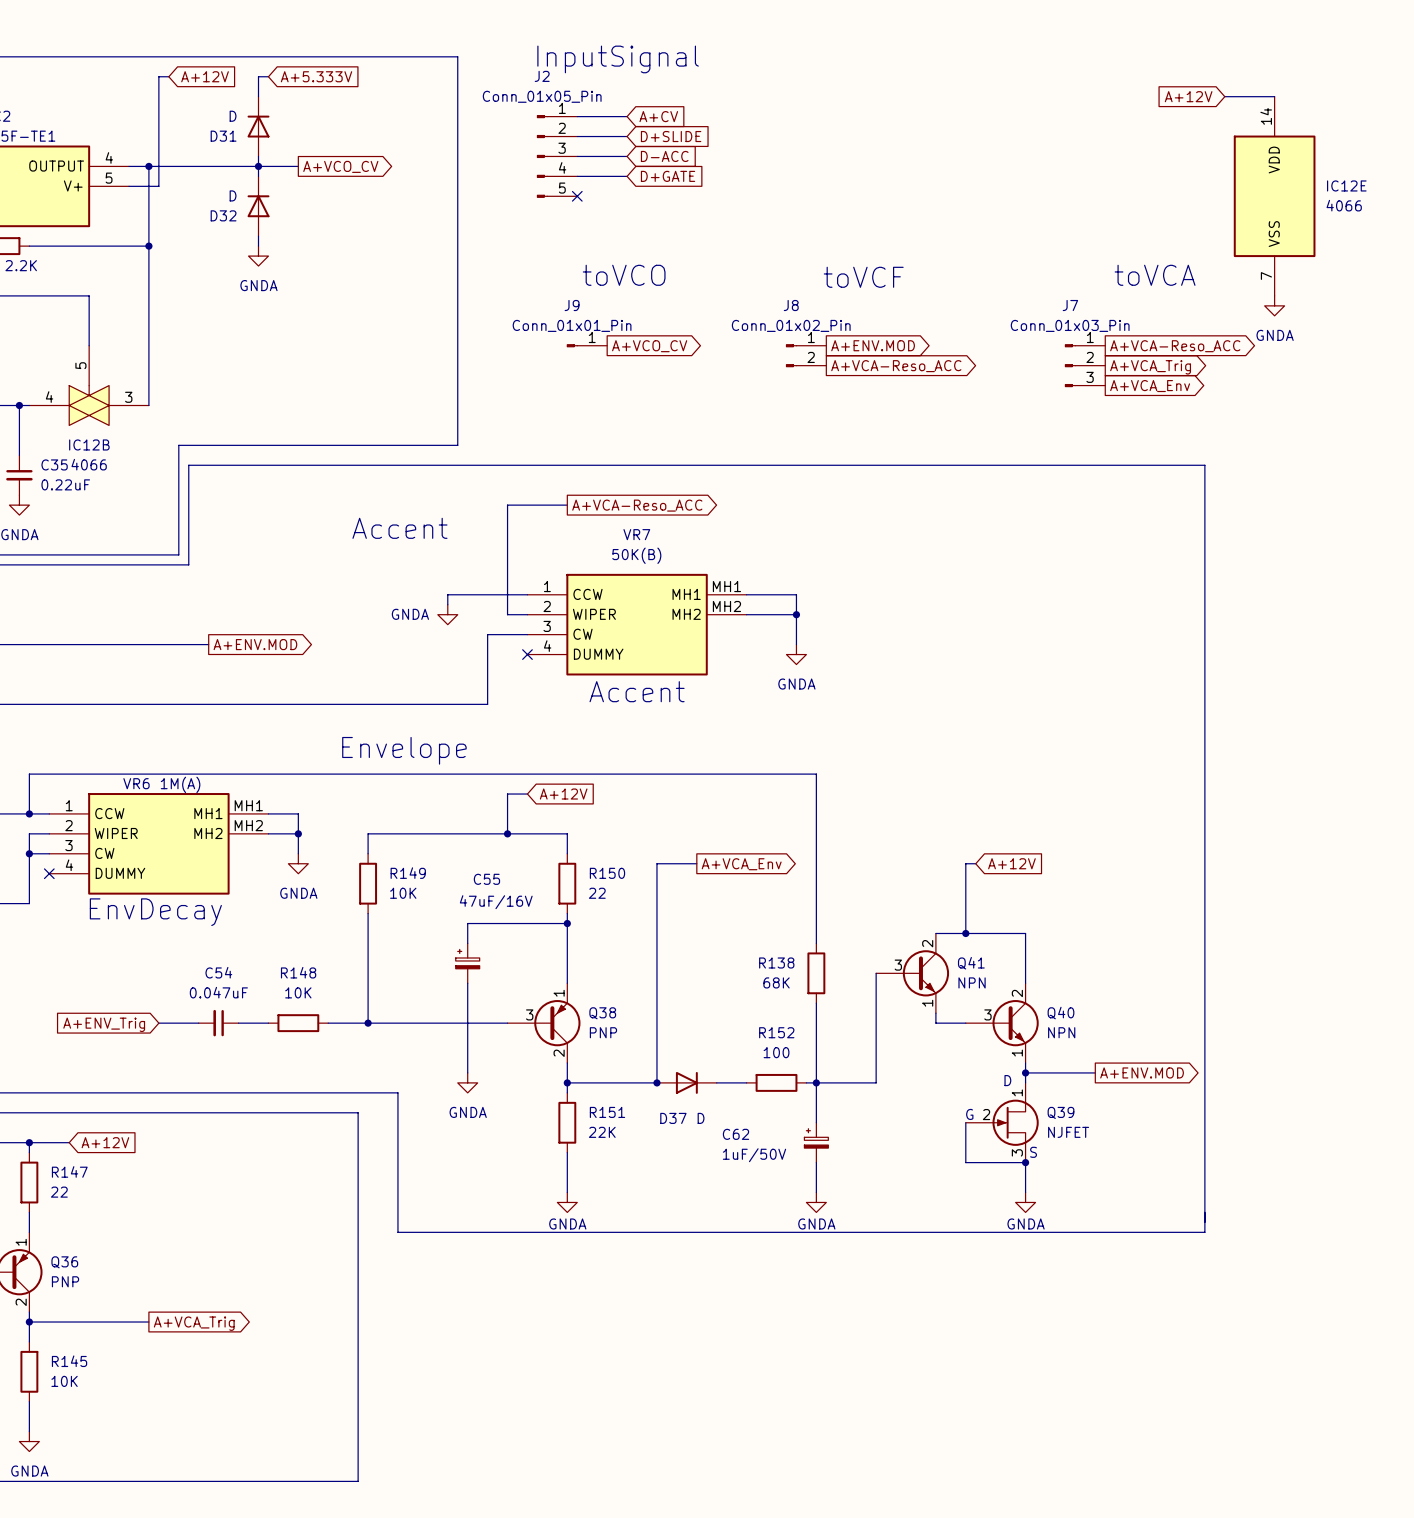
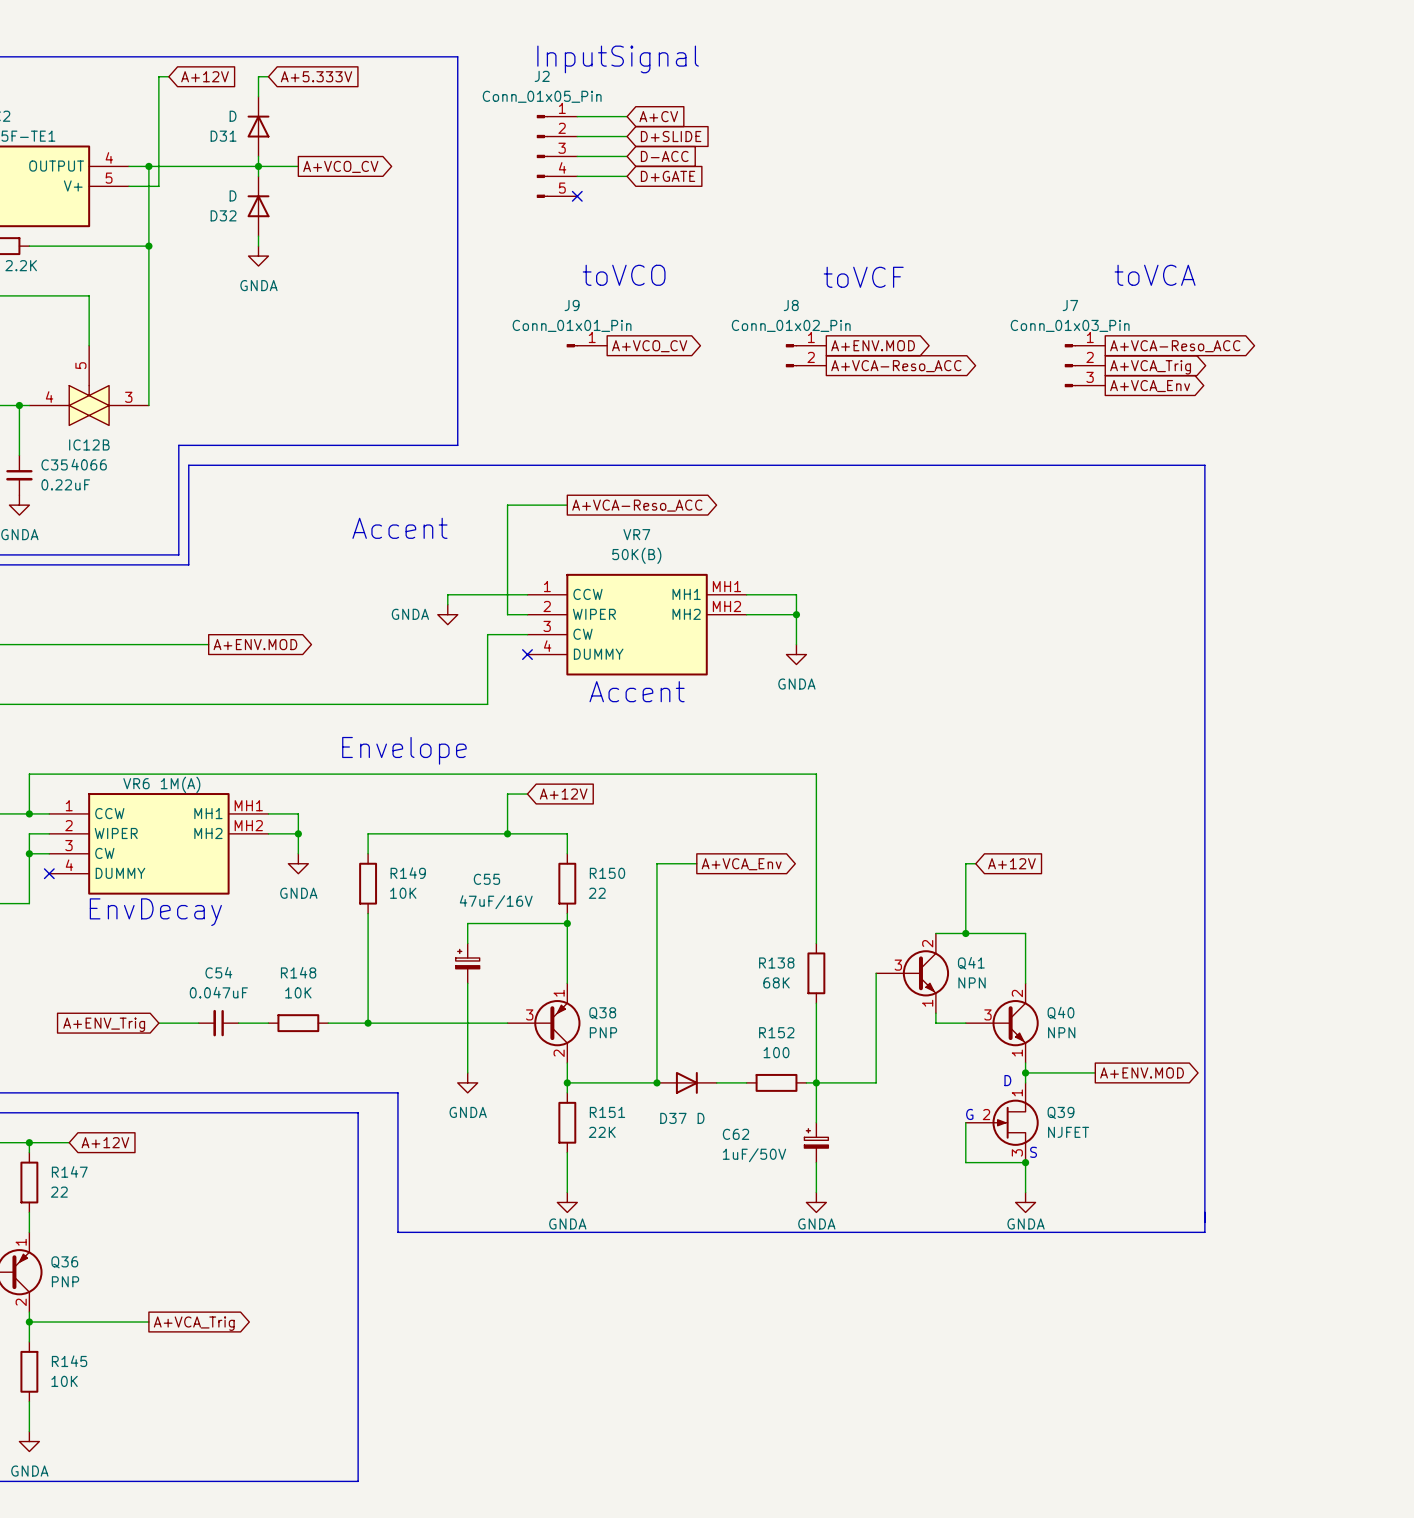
global label: A+12V (1188, 96) -> none
wire: (1224, 96) (1274, 96) -> none
IC12E: 4066 (1274, 196) -> none
power symbol: GNDA (1274, 305) -> none

